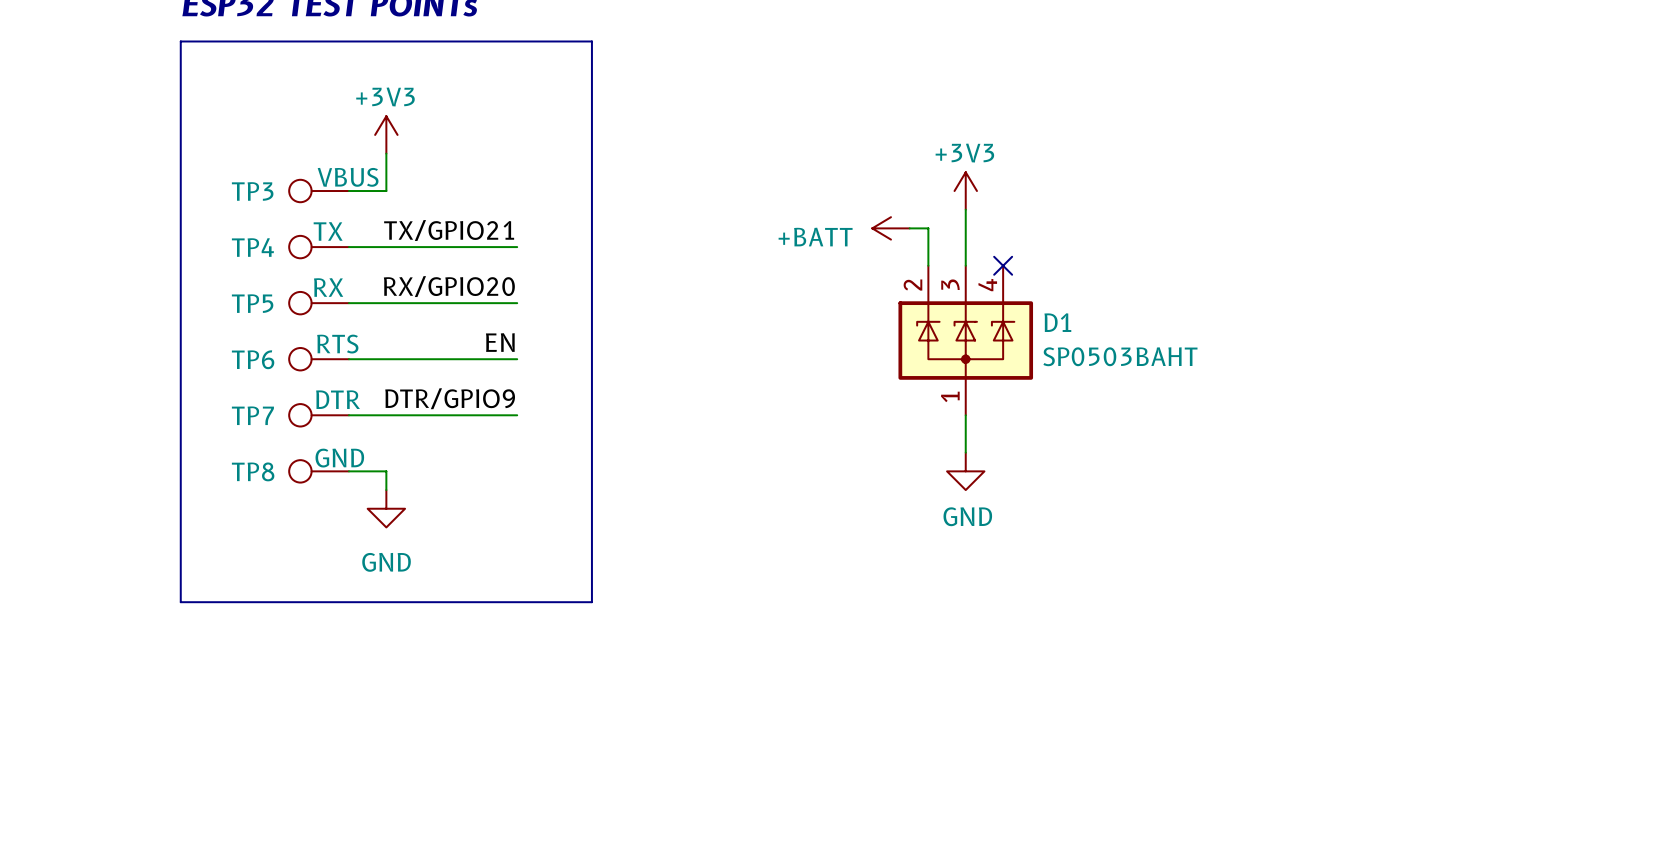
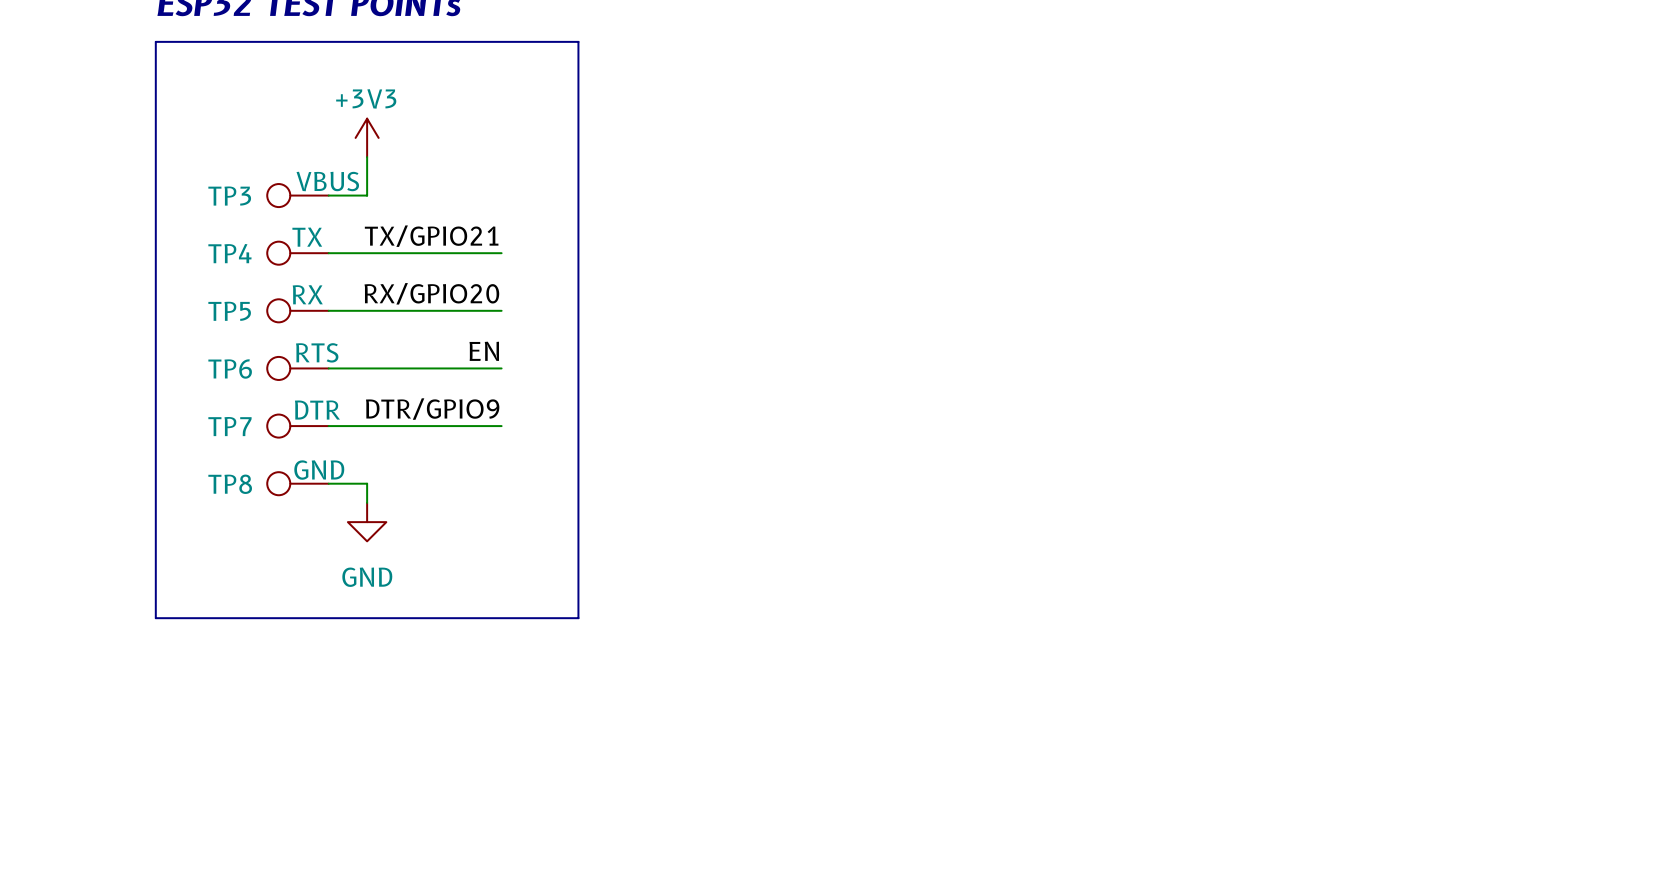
power symbol: +3V3 (965, 191) -> none
wire: (965, 209) (965, 265) -> none
power symbol: +BATT (890, 228) -> none
wire: (909, 228) (928, 228) (928, 265) -> none
no-connect mark: (1003, 265) -> none
D1: SP0503BAHT (965, 340) -> none
wire: (965, 415) (965, 452) -> none
power symbol: GND (965, 471) -> none

